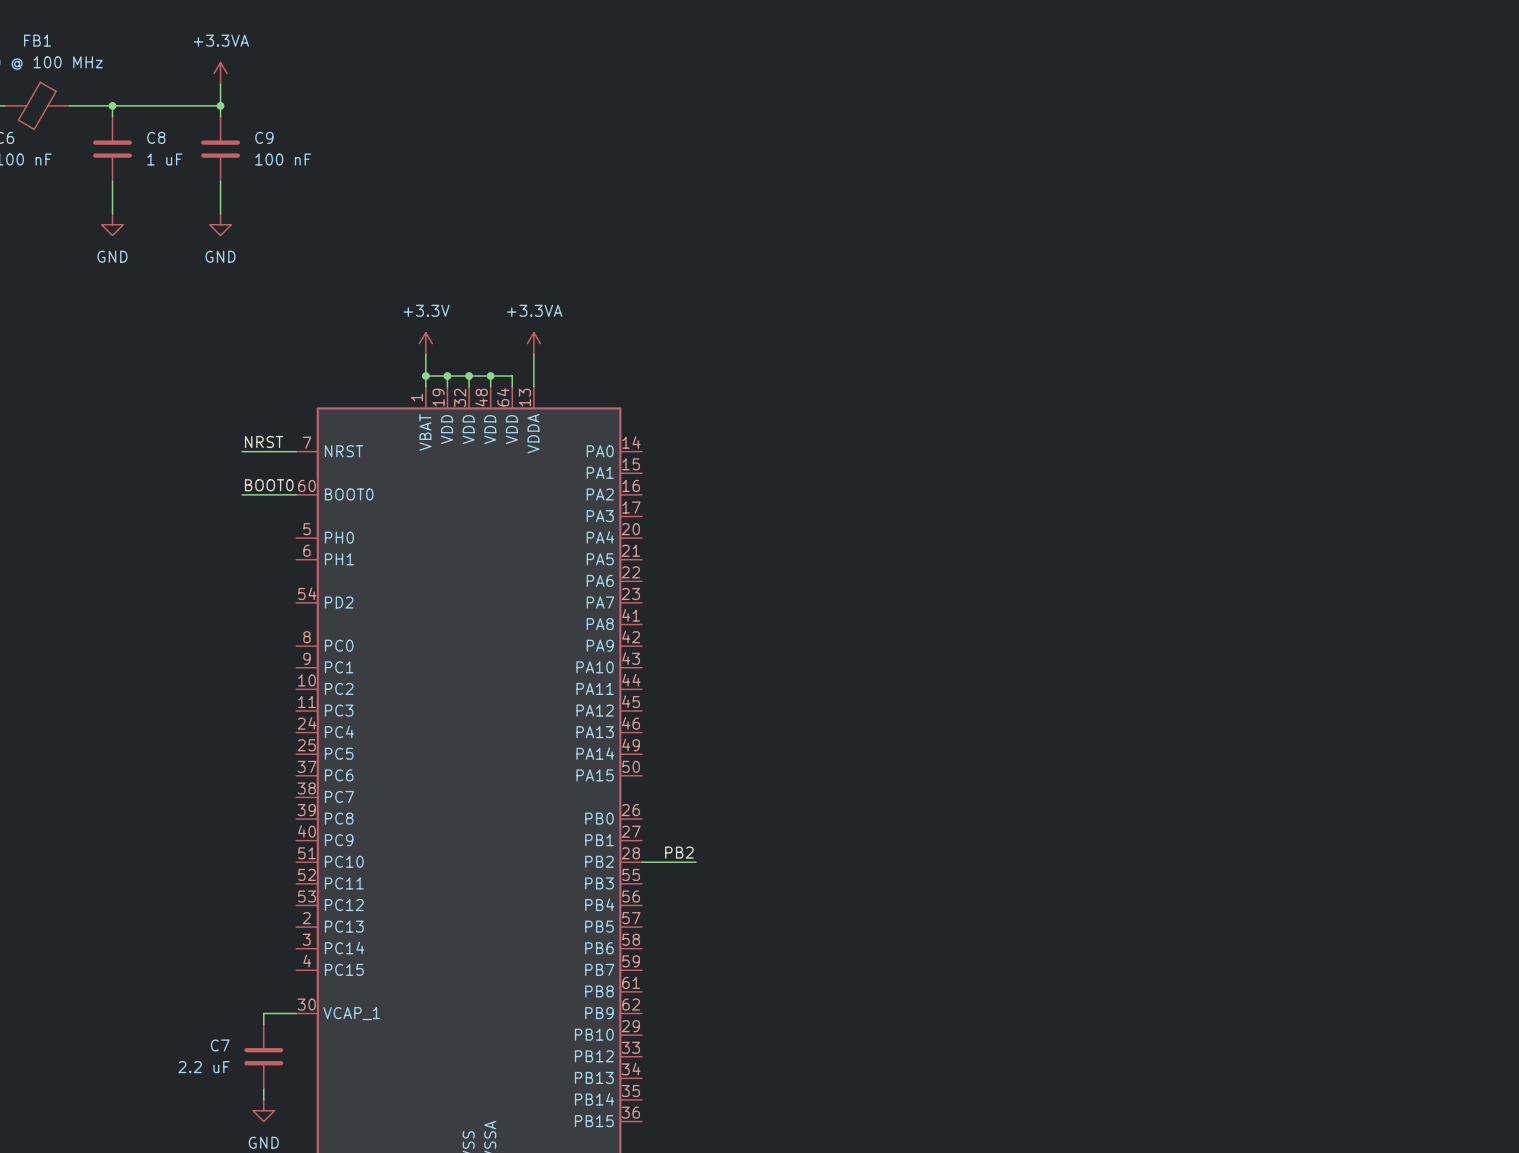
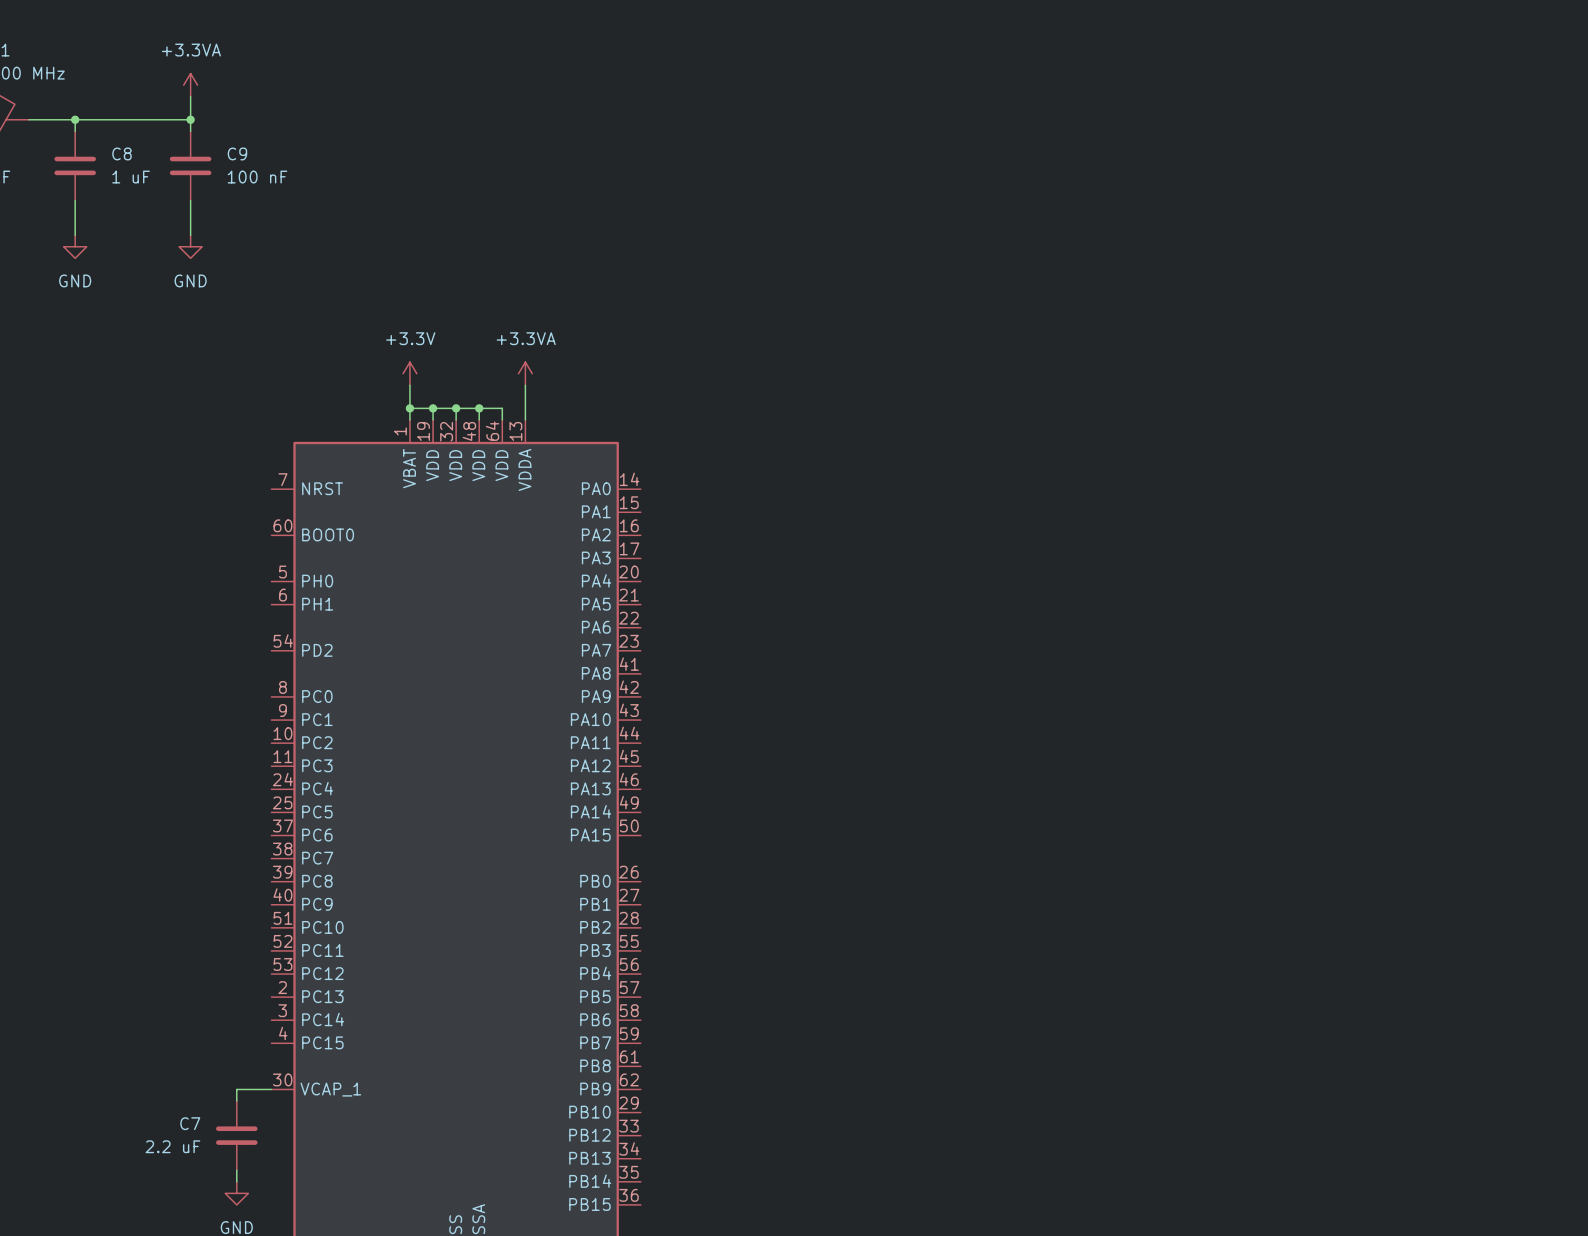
label: NRST (264, 442) -> none
wire: (242, 451) (296, 451) -> none
label: BOOT0 (269, 485) -> none
wire: (242, 494) (296, 494) -> none
label: PB2 (679, 852) -> none
wire: (641, 862) (695, 862) -> none

